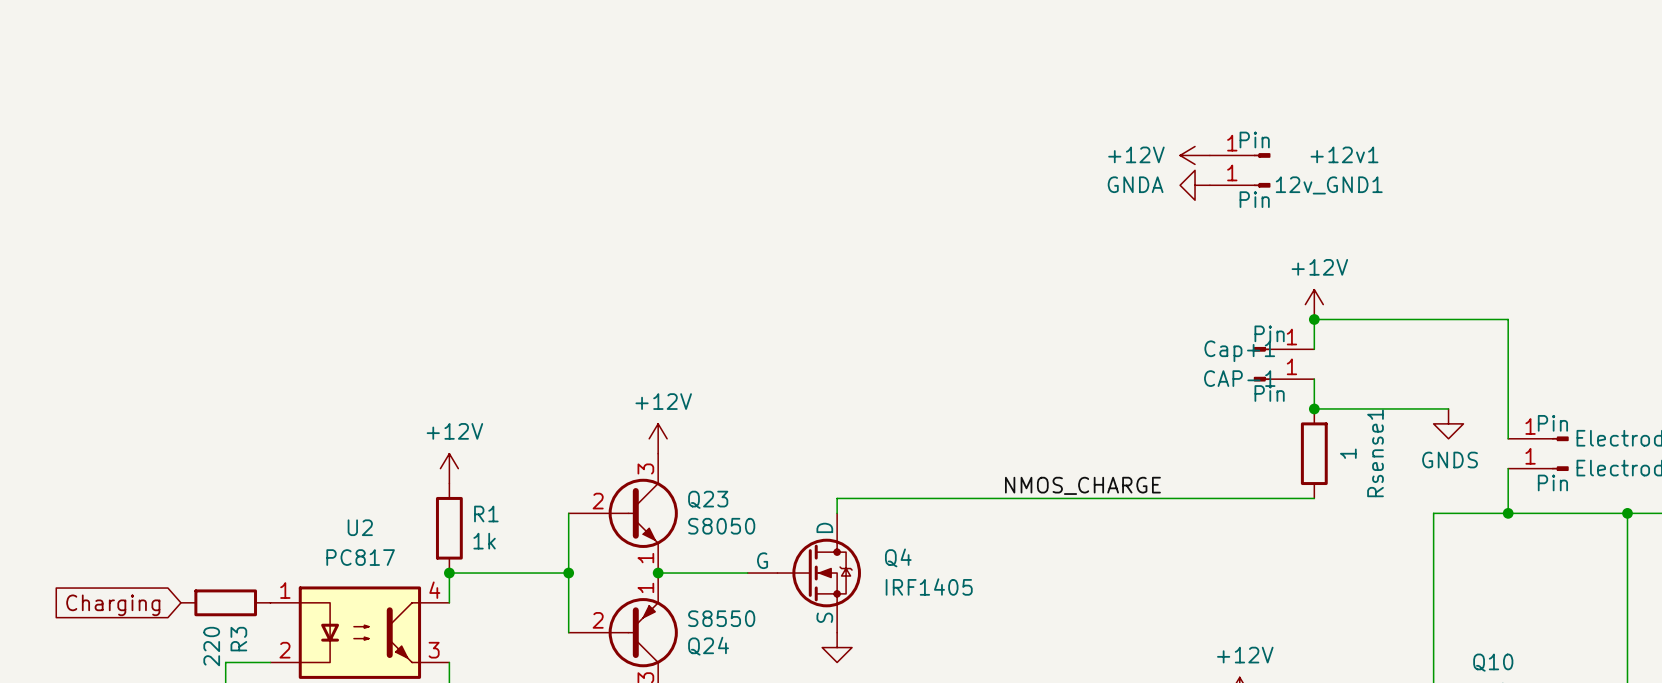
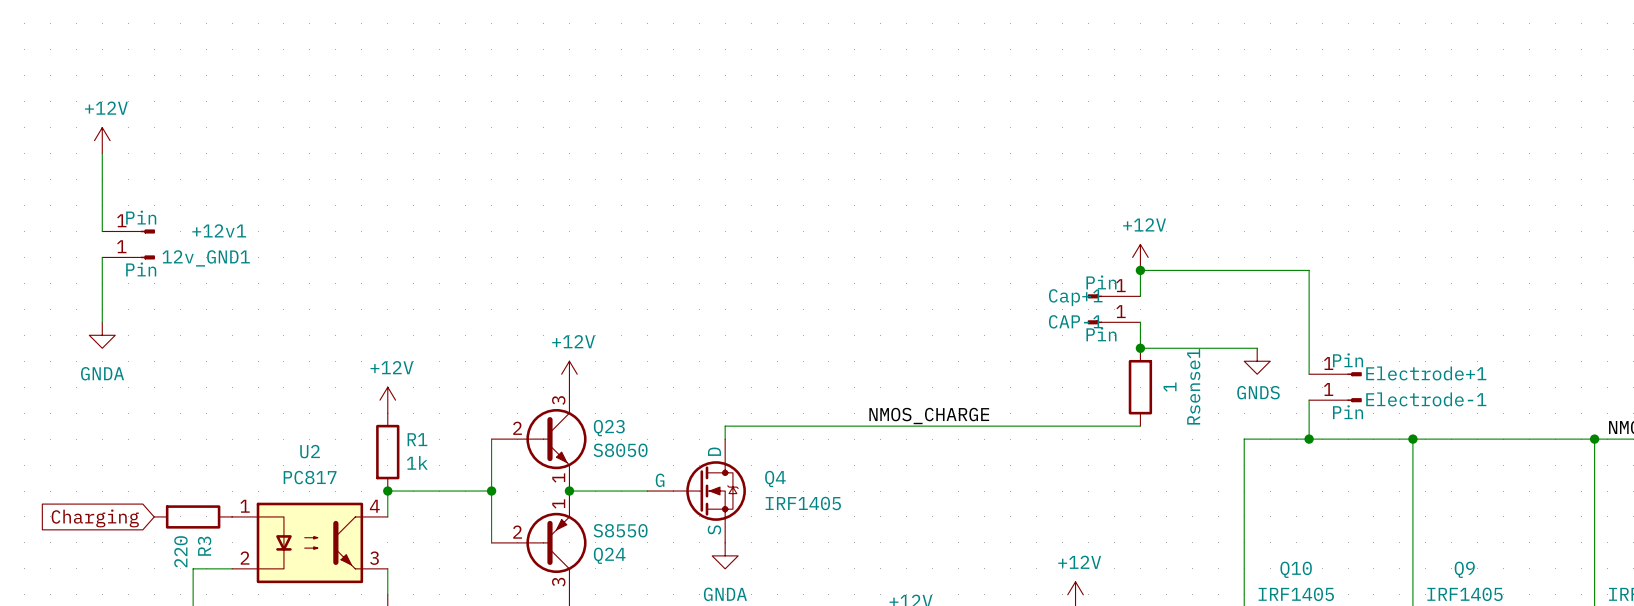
power symbol: +12V (1195, 155) -> none
+12v1 position: (1240, 155) -> (128, 231)
power symbol: none -> +12V (102, 140)
wire: none -> (102, 153) (102, 231)
power symbol: GNDA (1195, 185) -> none
12v_GND1 position: (1240, 185) -> (128, 257)
wire: none -> (102, 257) (102, 322)
power symbol: none -> GNDA (102, 335)

